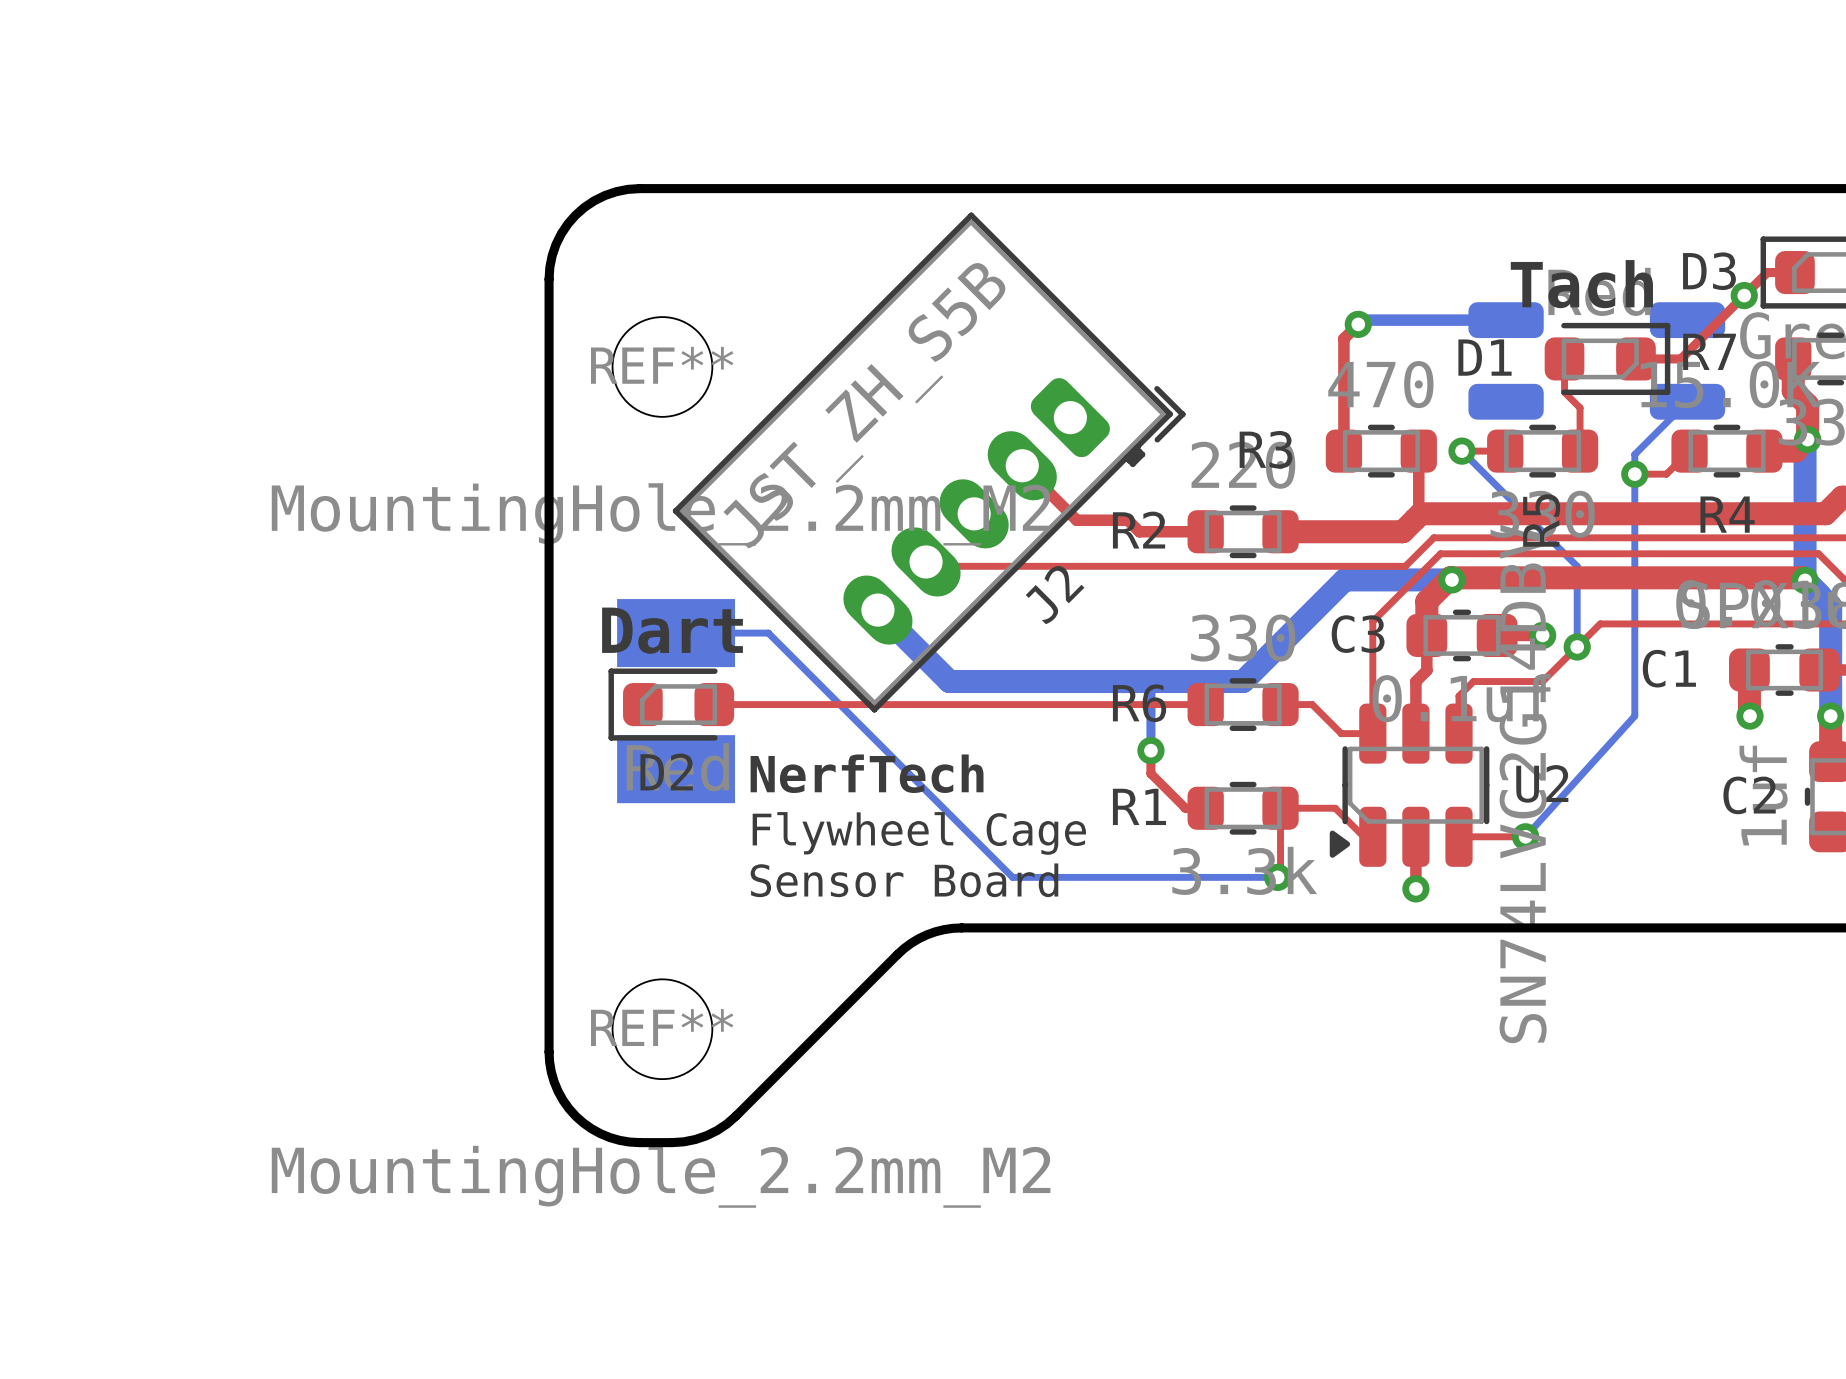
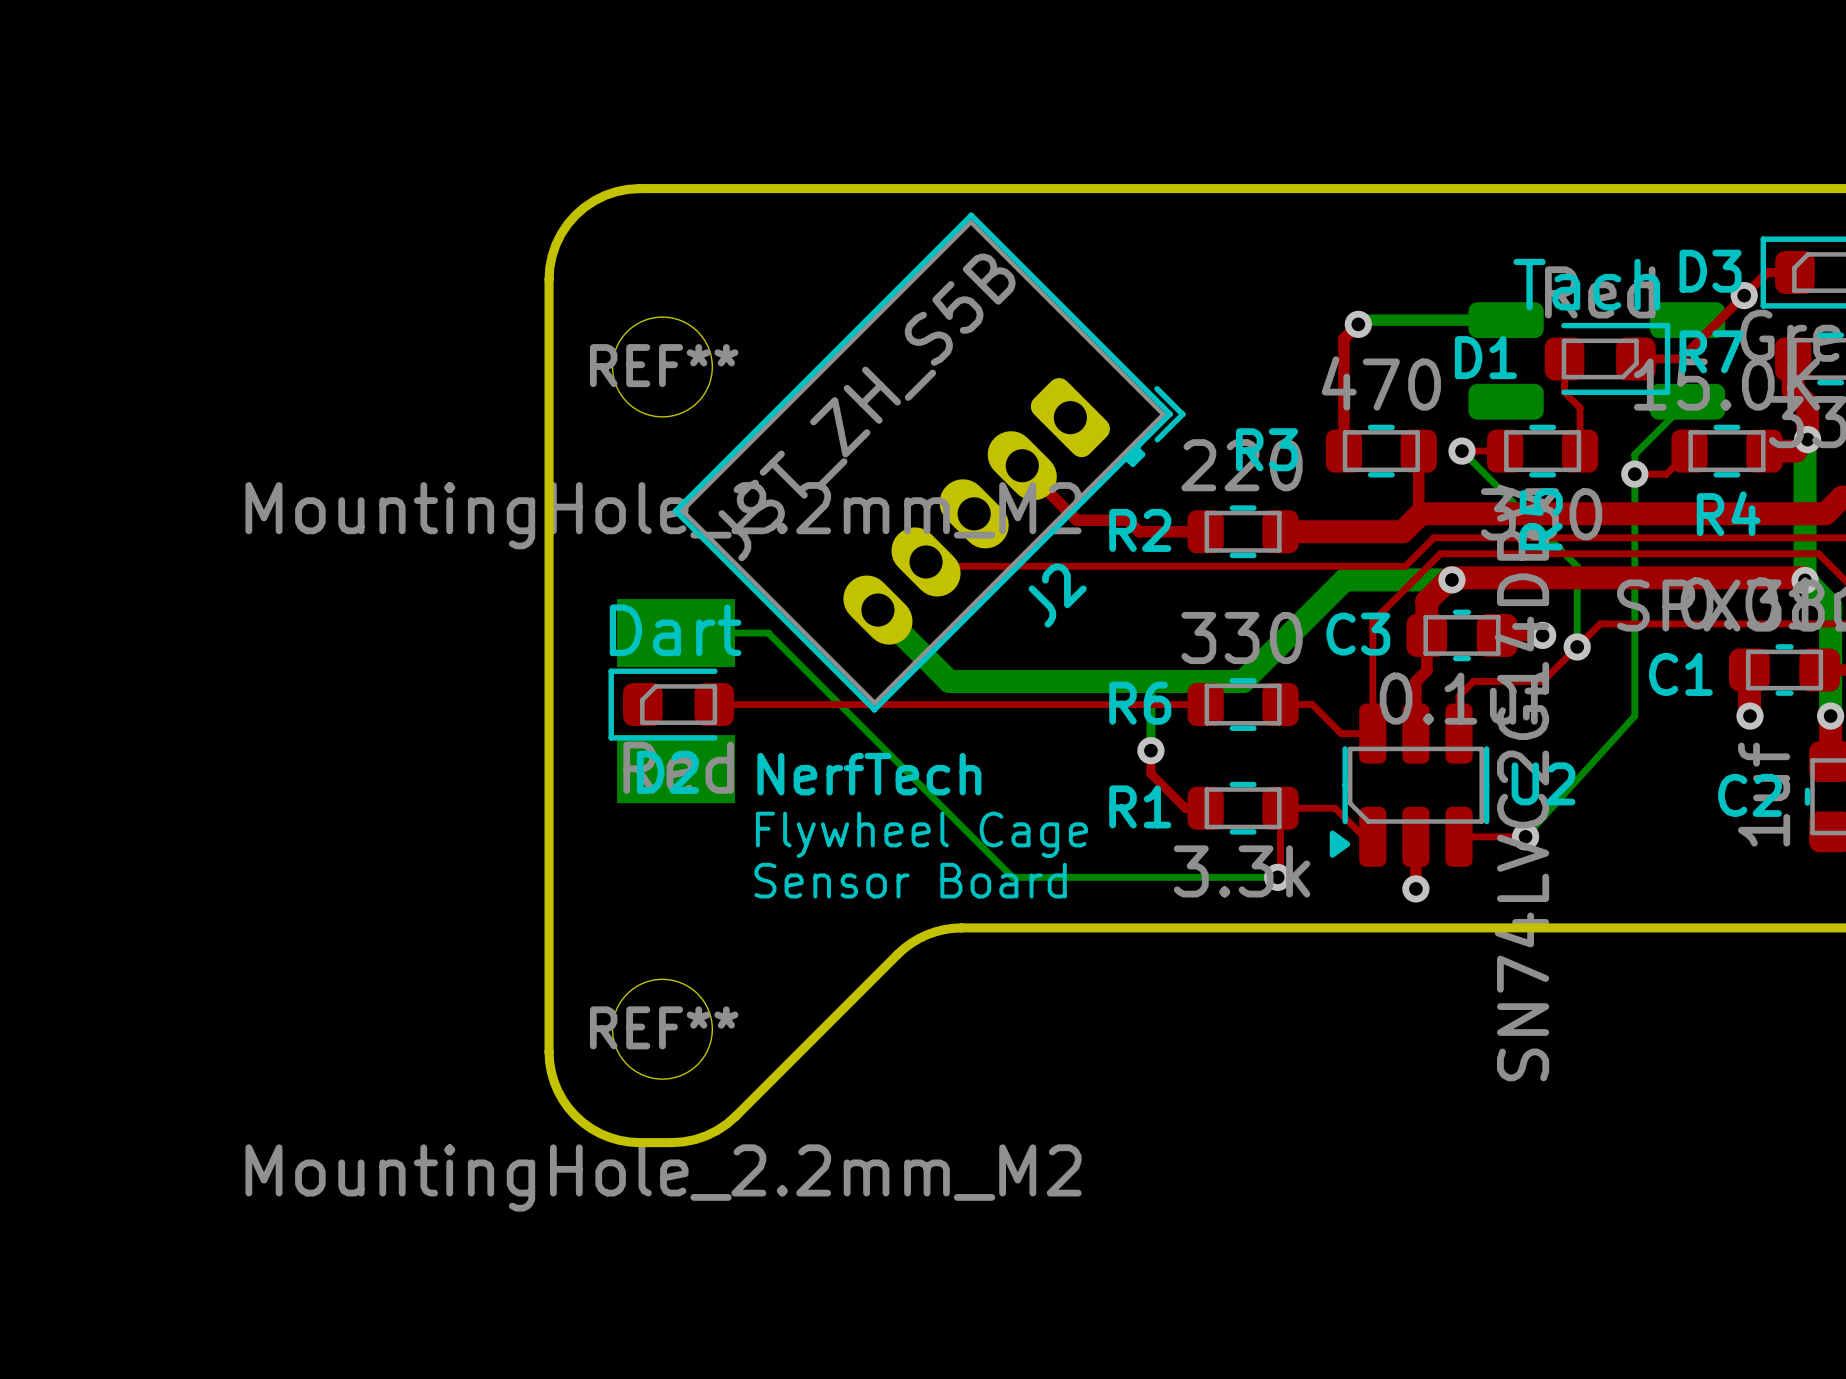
C1 name position: C1 (1669, 668) -> C1 (1680, 674)

